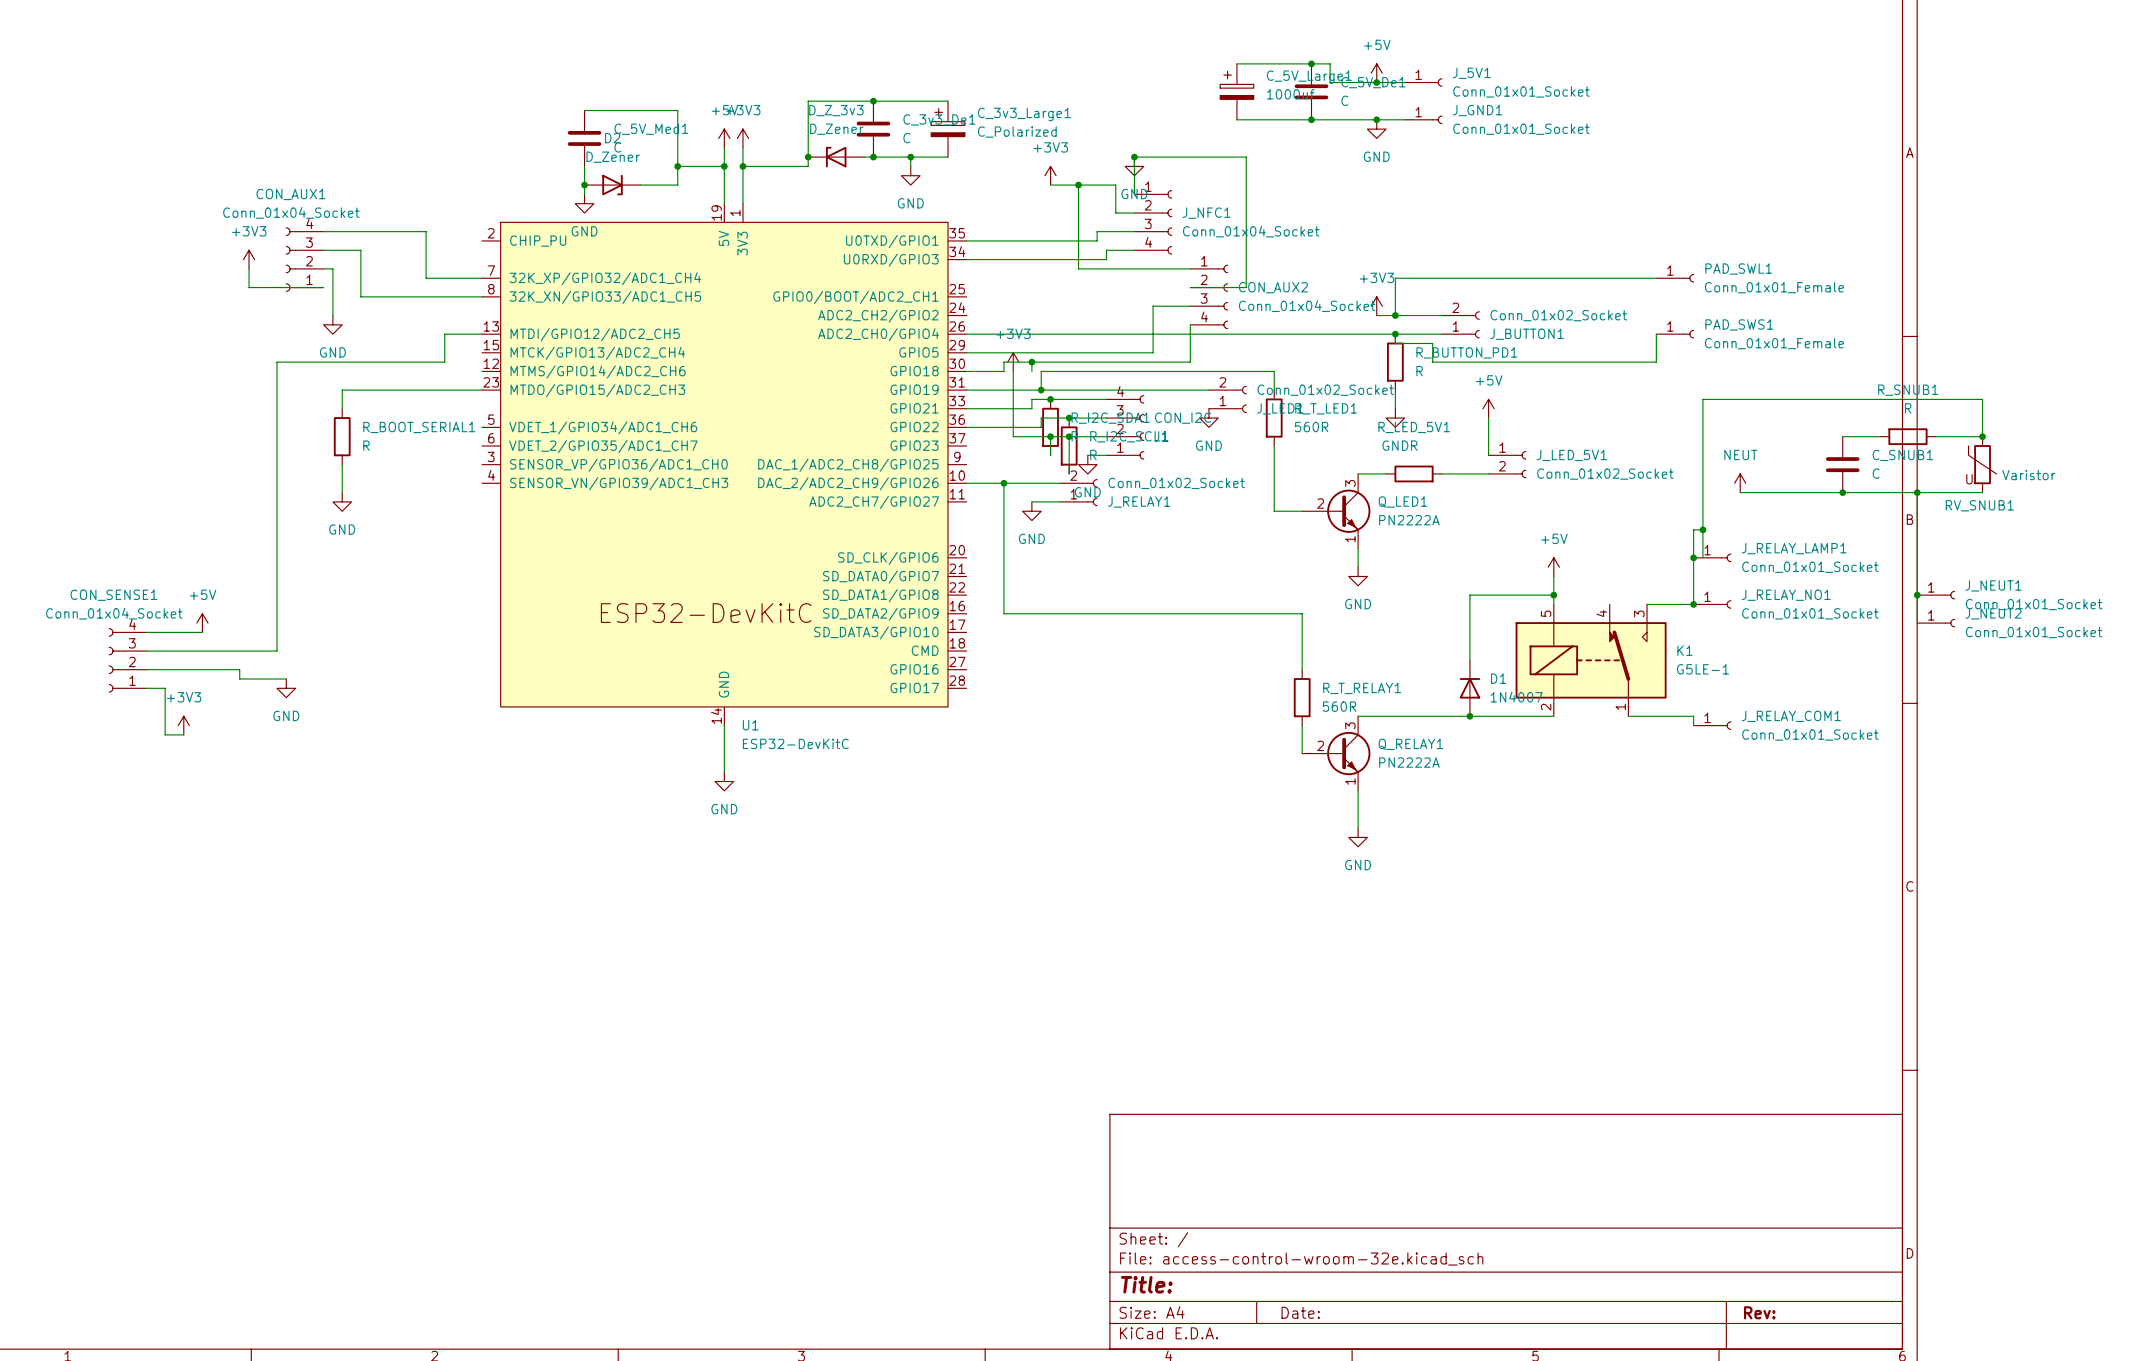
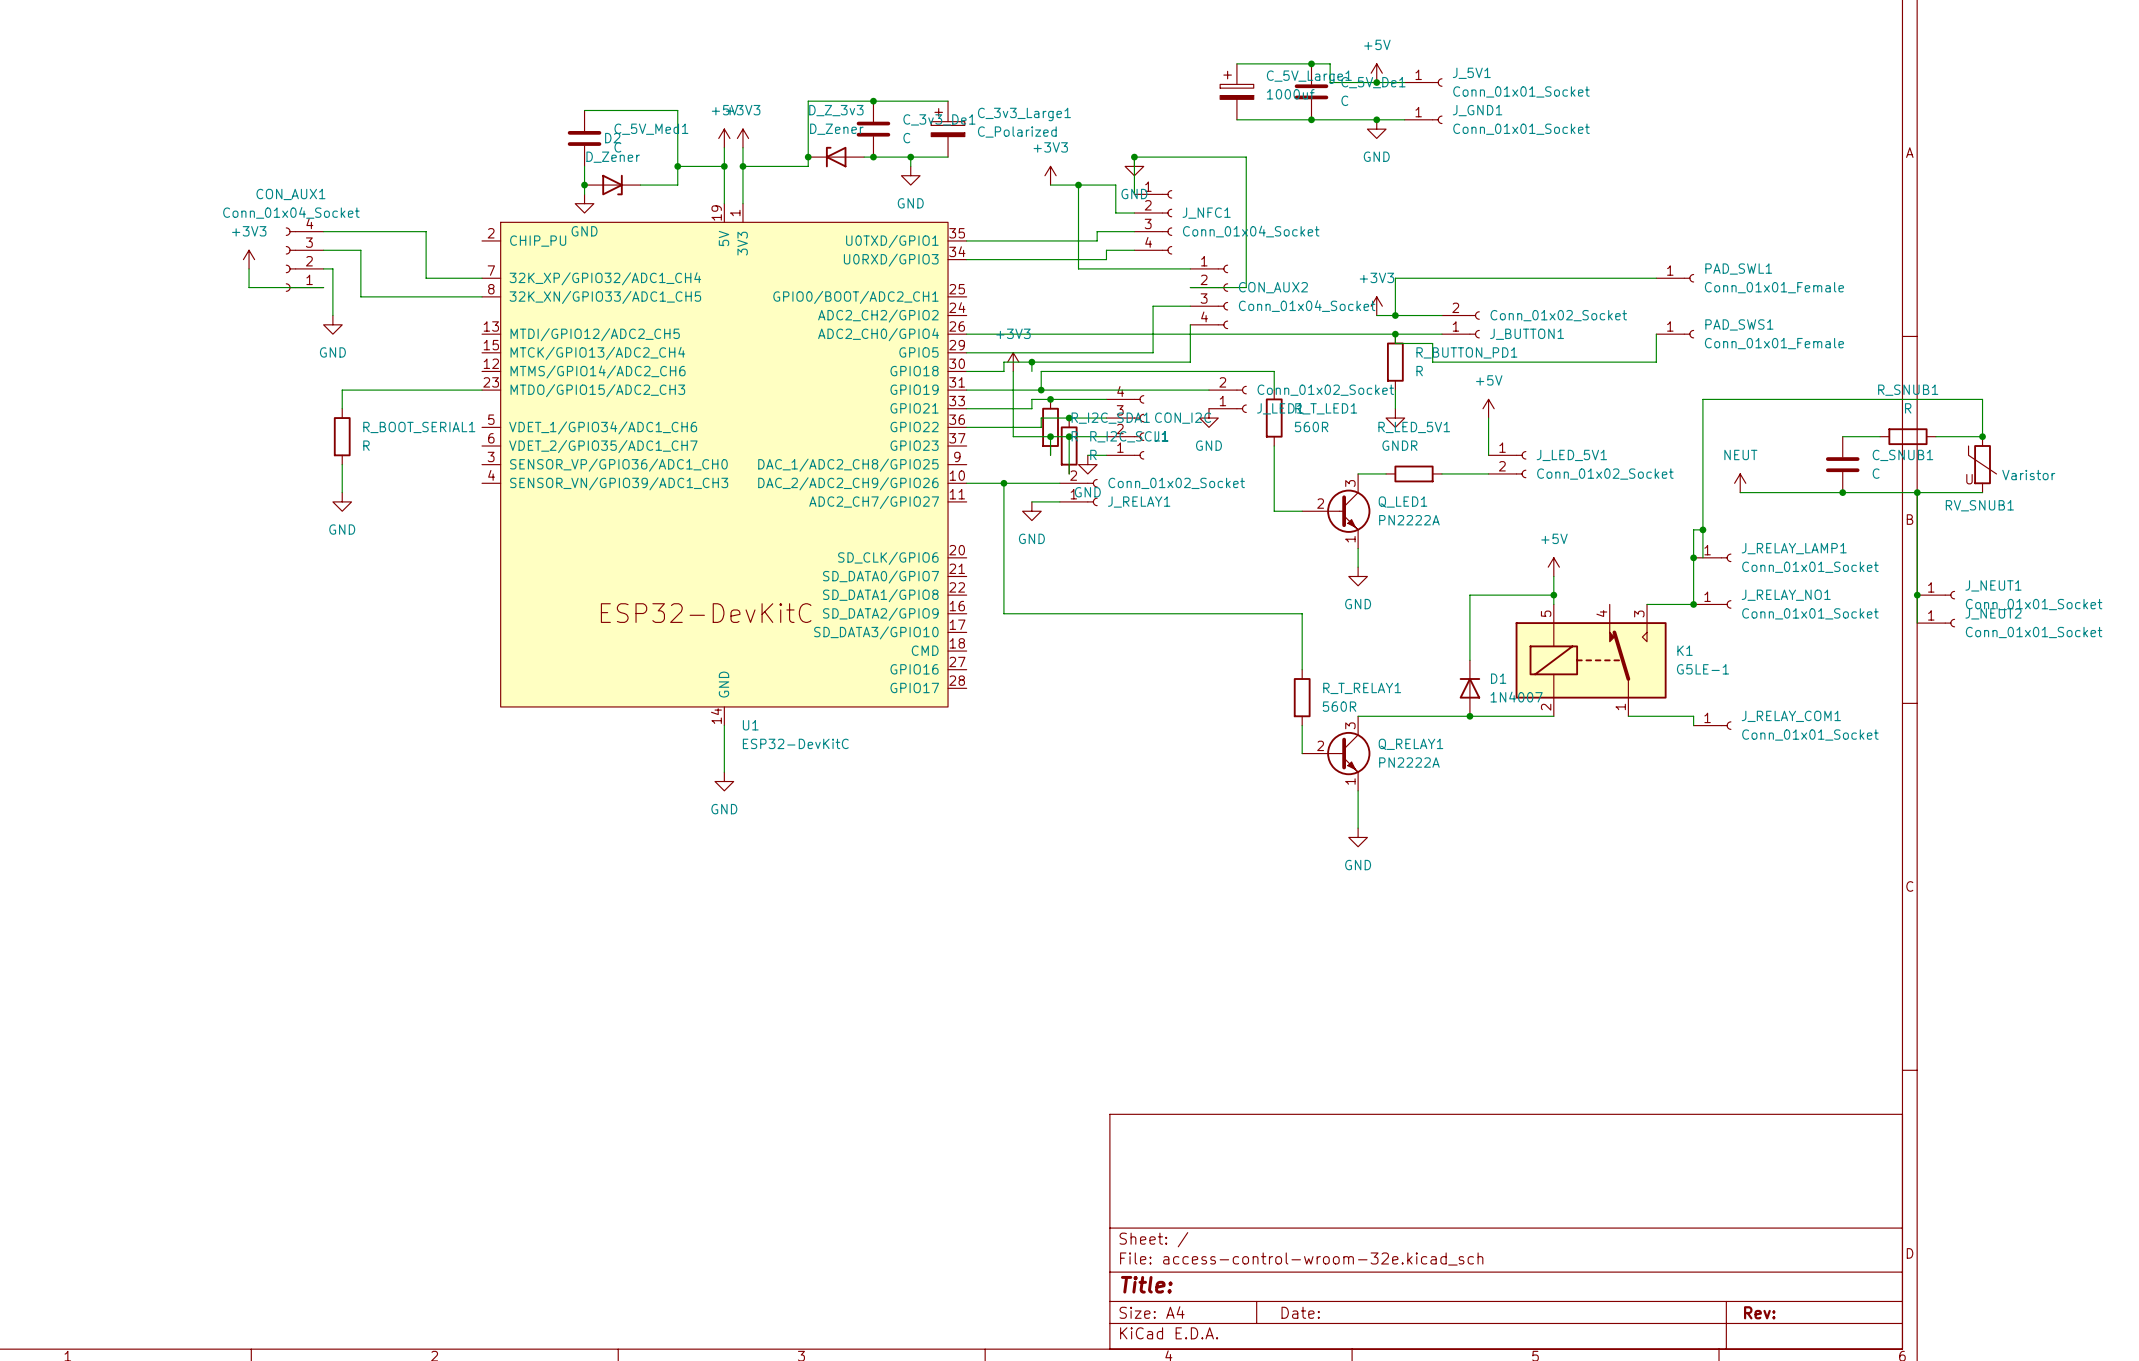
wire: (482, 334) (444, 334) (444, 362) (276, 362) (276, 651) (146, 651) -> none
power symbol: +5V (202, 623) -> none
wire: (146, 632) (202, 632) -> none
CON_SENSE1: Conn_01x04_Socket (127, 660) -> none
wire: (146, 669) (239, 669) (239, 679) (286, 679) -> none
wire: (146, 688) (165, 688) (165, 734) (183, 734) -> none
power symbol: GND (286, 688) -> none
power symbol: +3V3 (183, 725) -> none

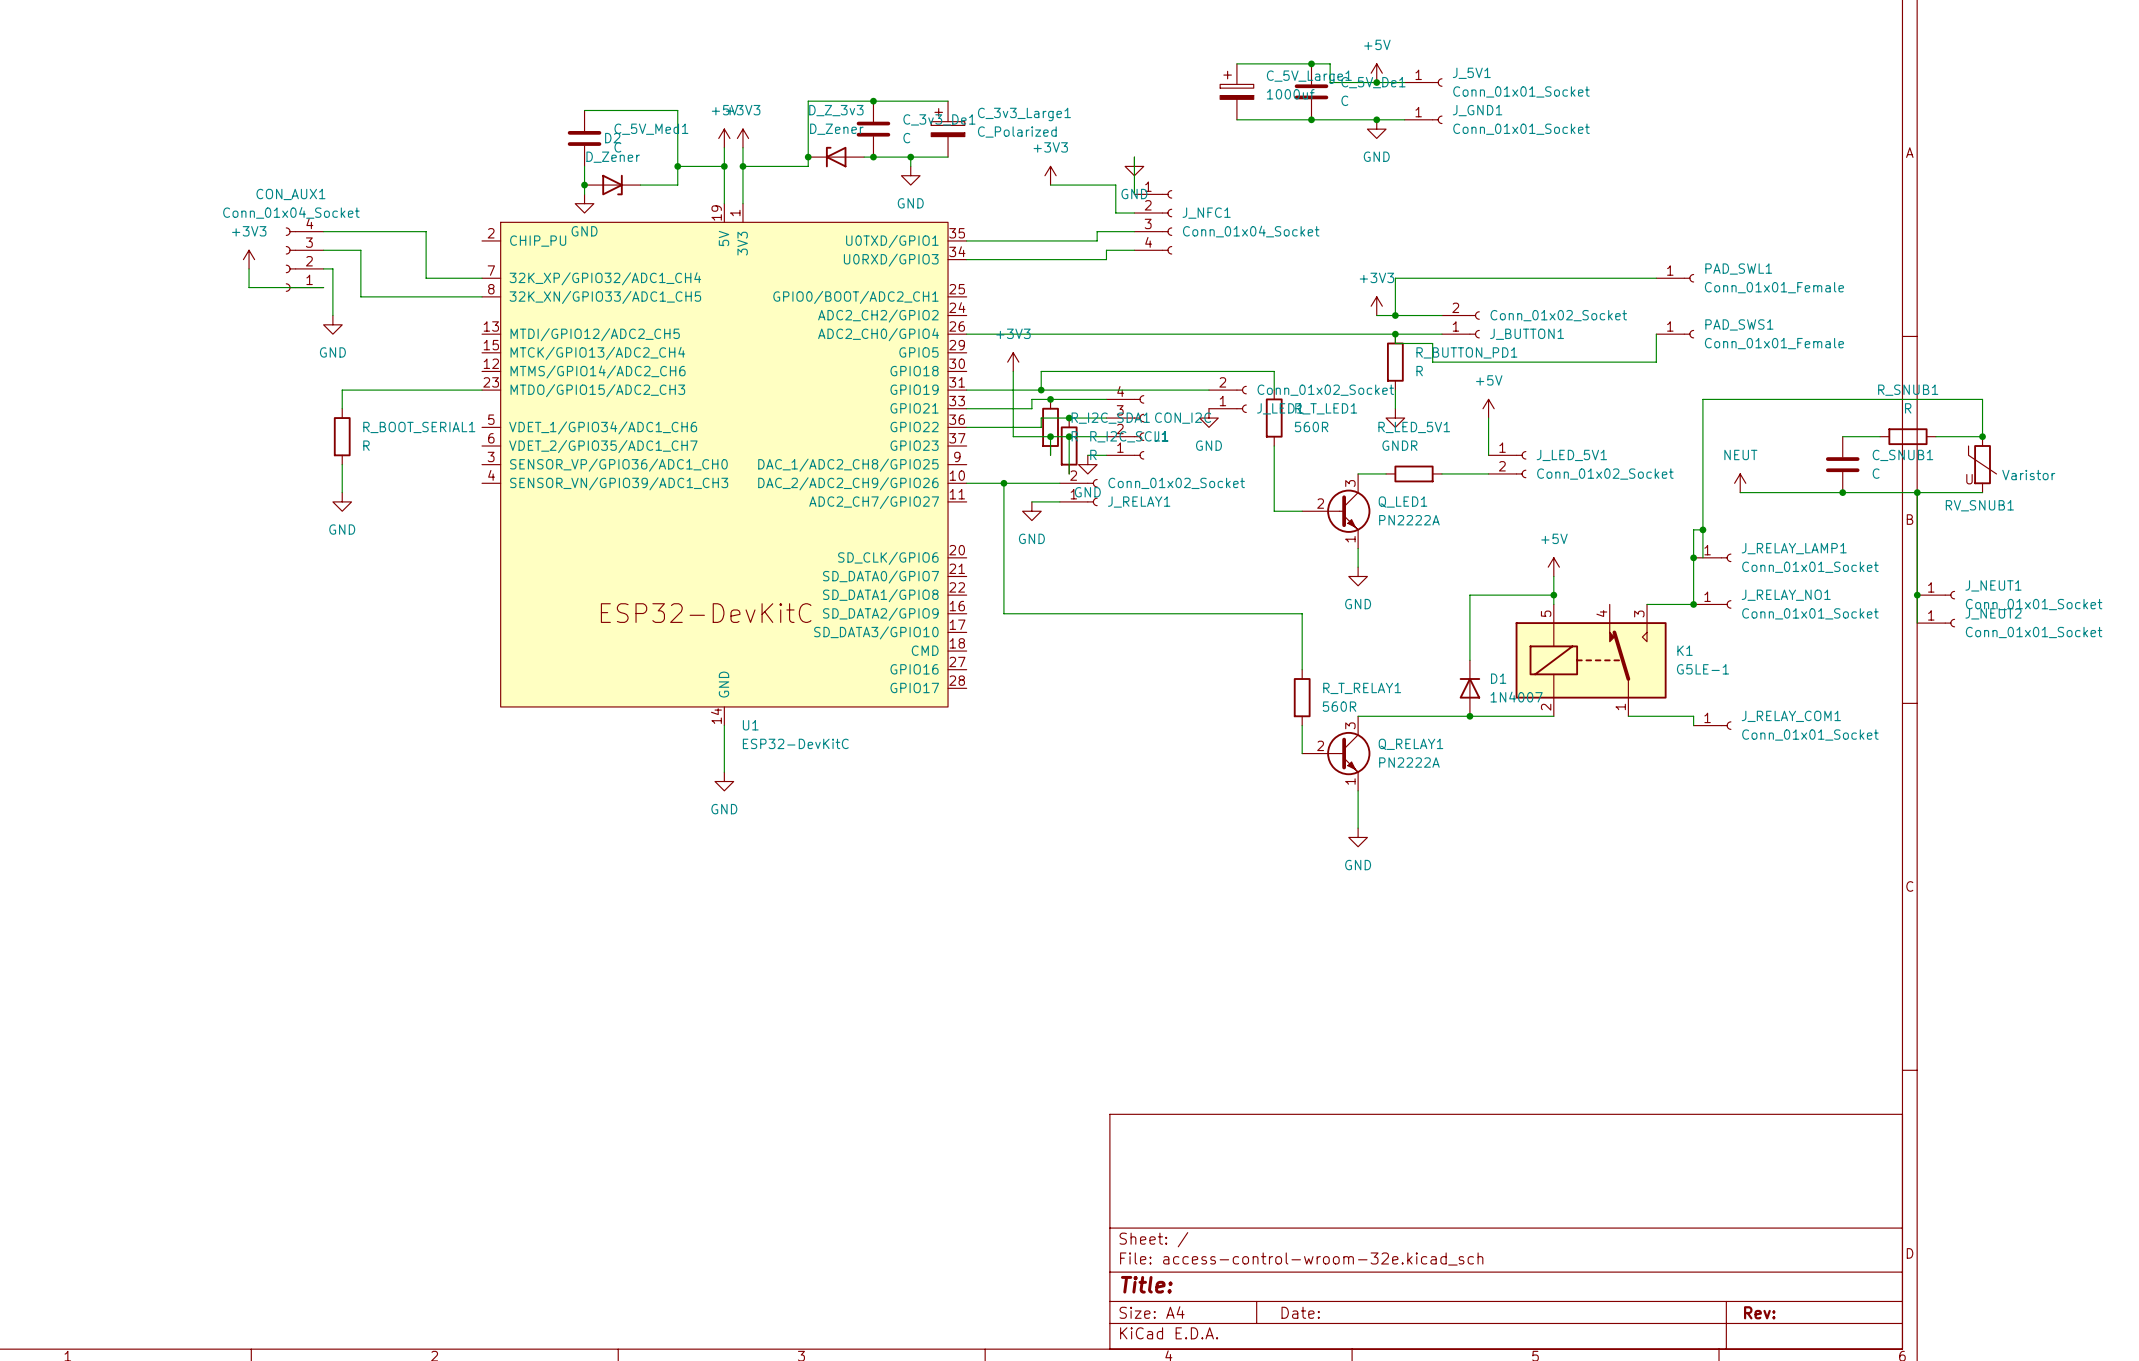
wire: (1134, 157) (1246, 157) (1246, 287) (1190, 287) -> none
junction: (1134, 157) -> none
wire: (1078, 185) (1078, 268) (1190, 268) -> none
junction: (1078, 185) -> none
CON_AUX2: Conn_01x04_Socket (1209, 296) -> none
wire: (1190, 306) (1153, 306) (1153, 352) (966, 352) -> none
wire: (1190, 324) (1190, 362) (1003, 362) (1003, 371) (966, 371) -> none
wire: (1031, 362) (1031, 371) -> none
junction: (1031, 362) -> none

